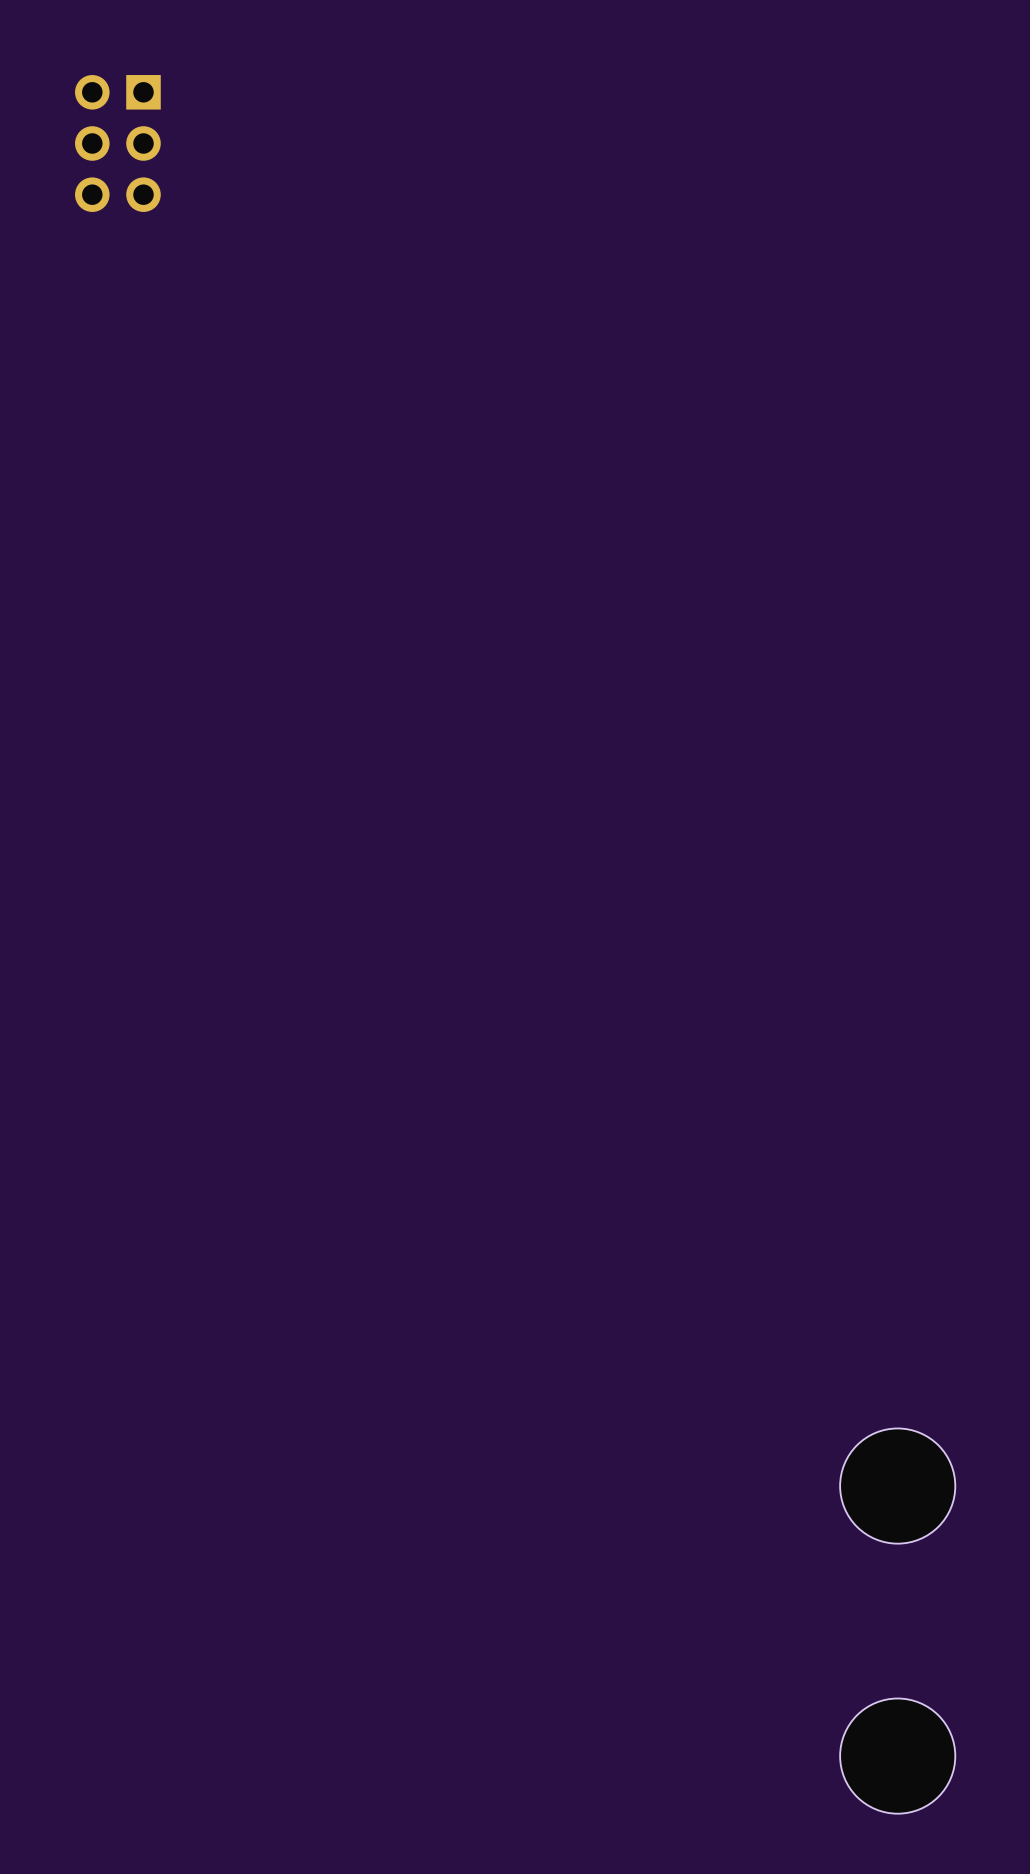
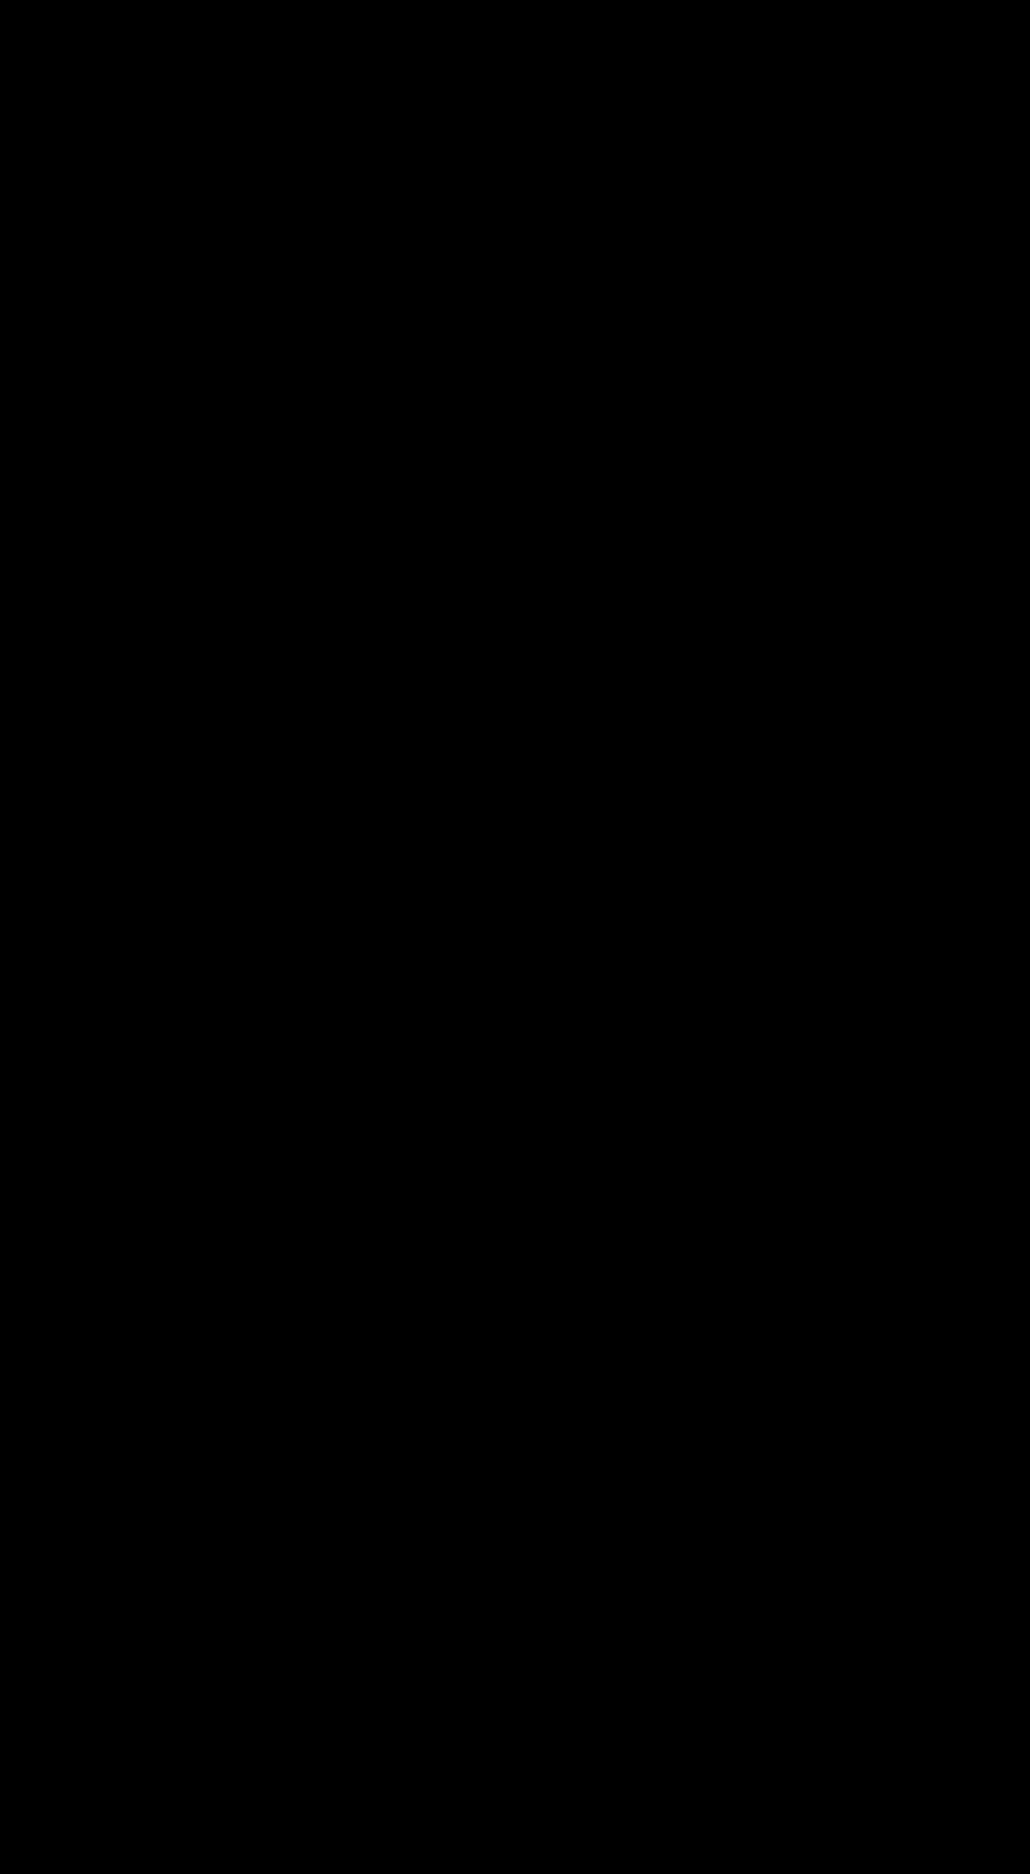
part: (117, 143) -> none
part: (897, 1486) -> none
part: (897, 1756) -> none

